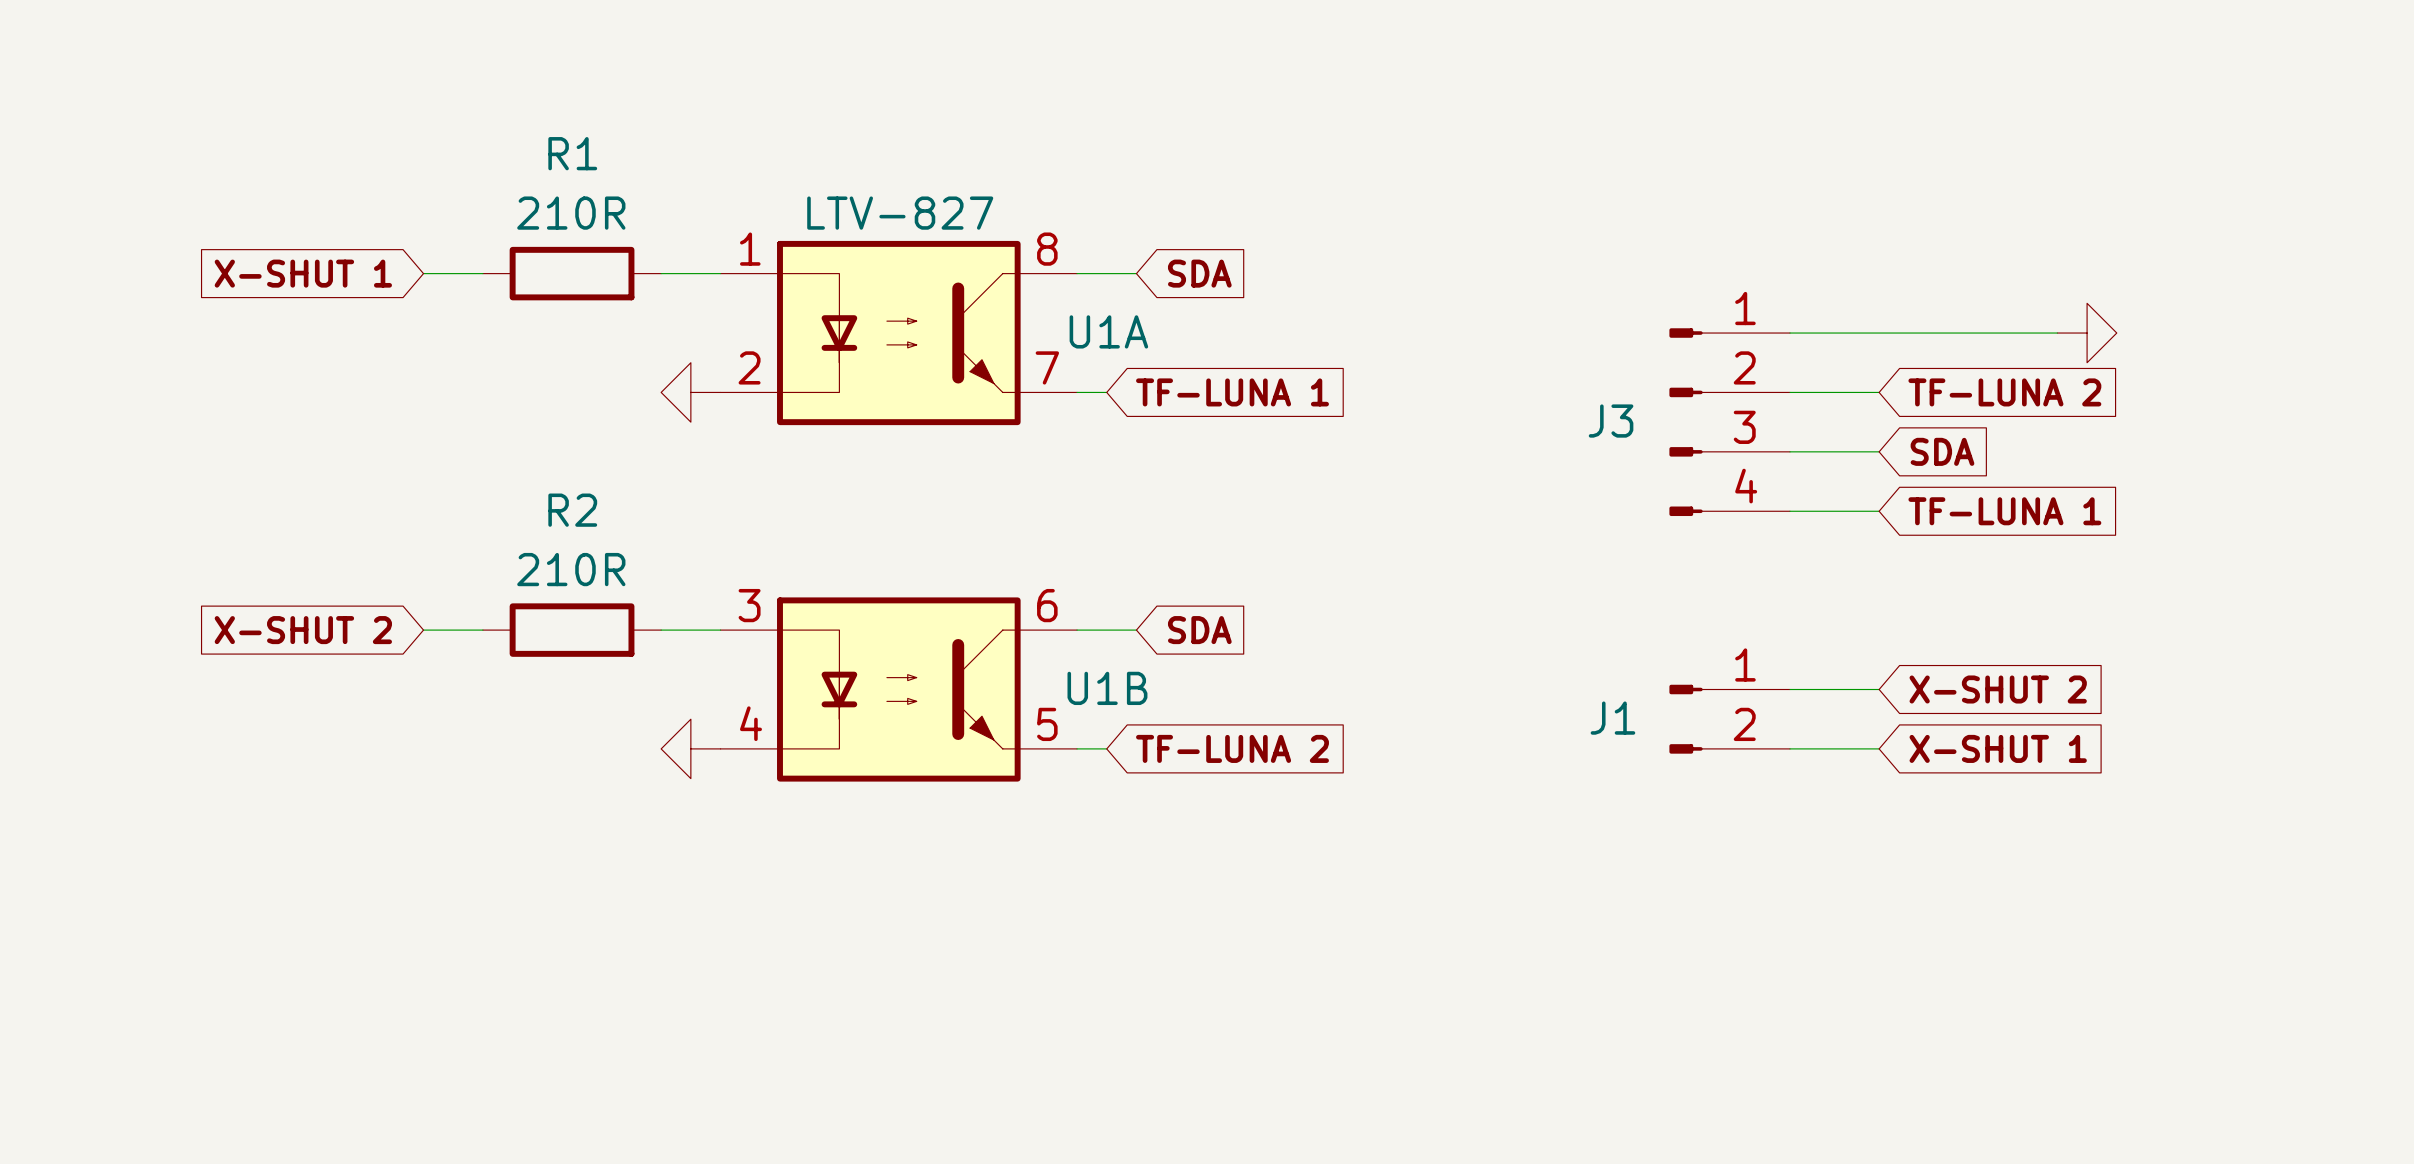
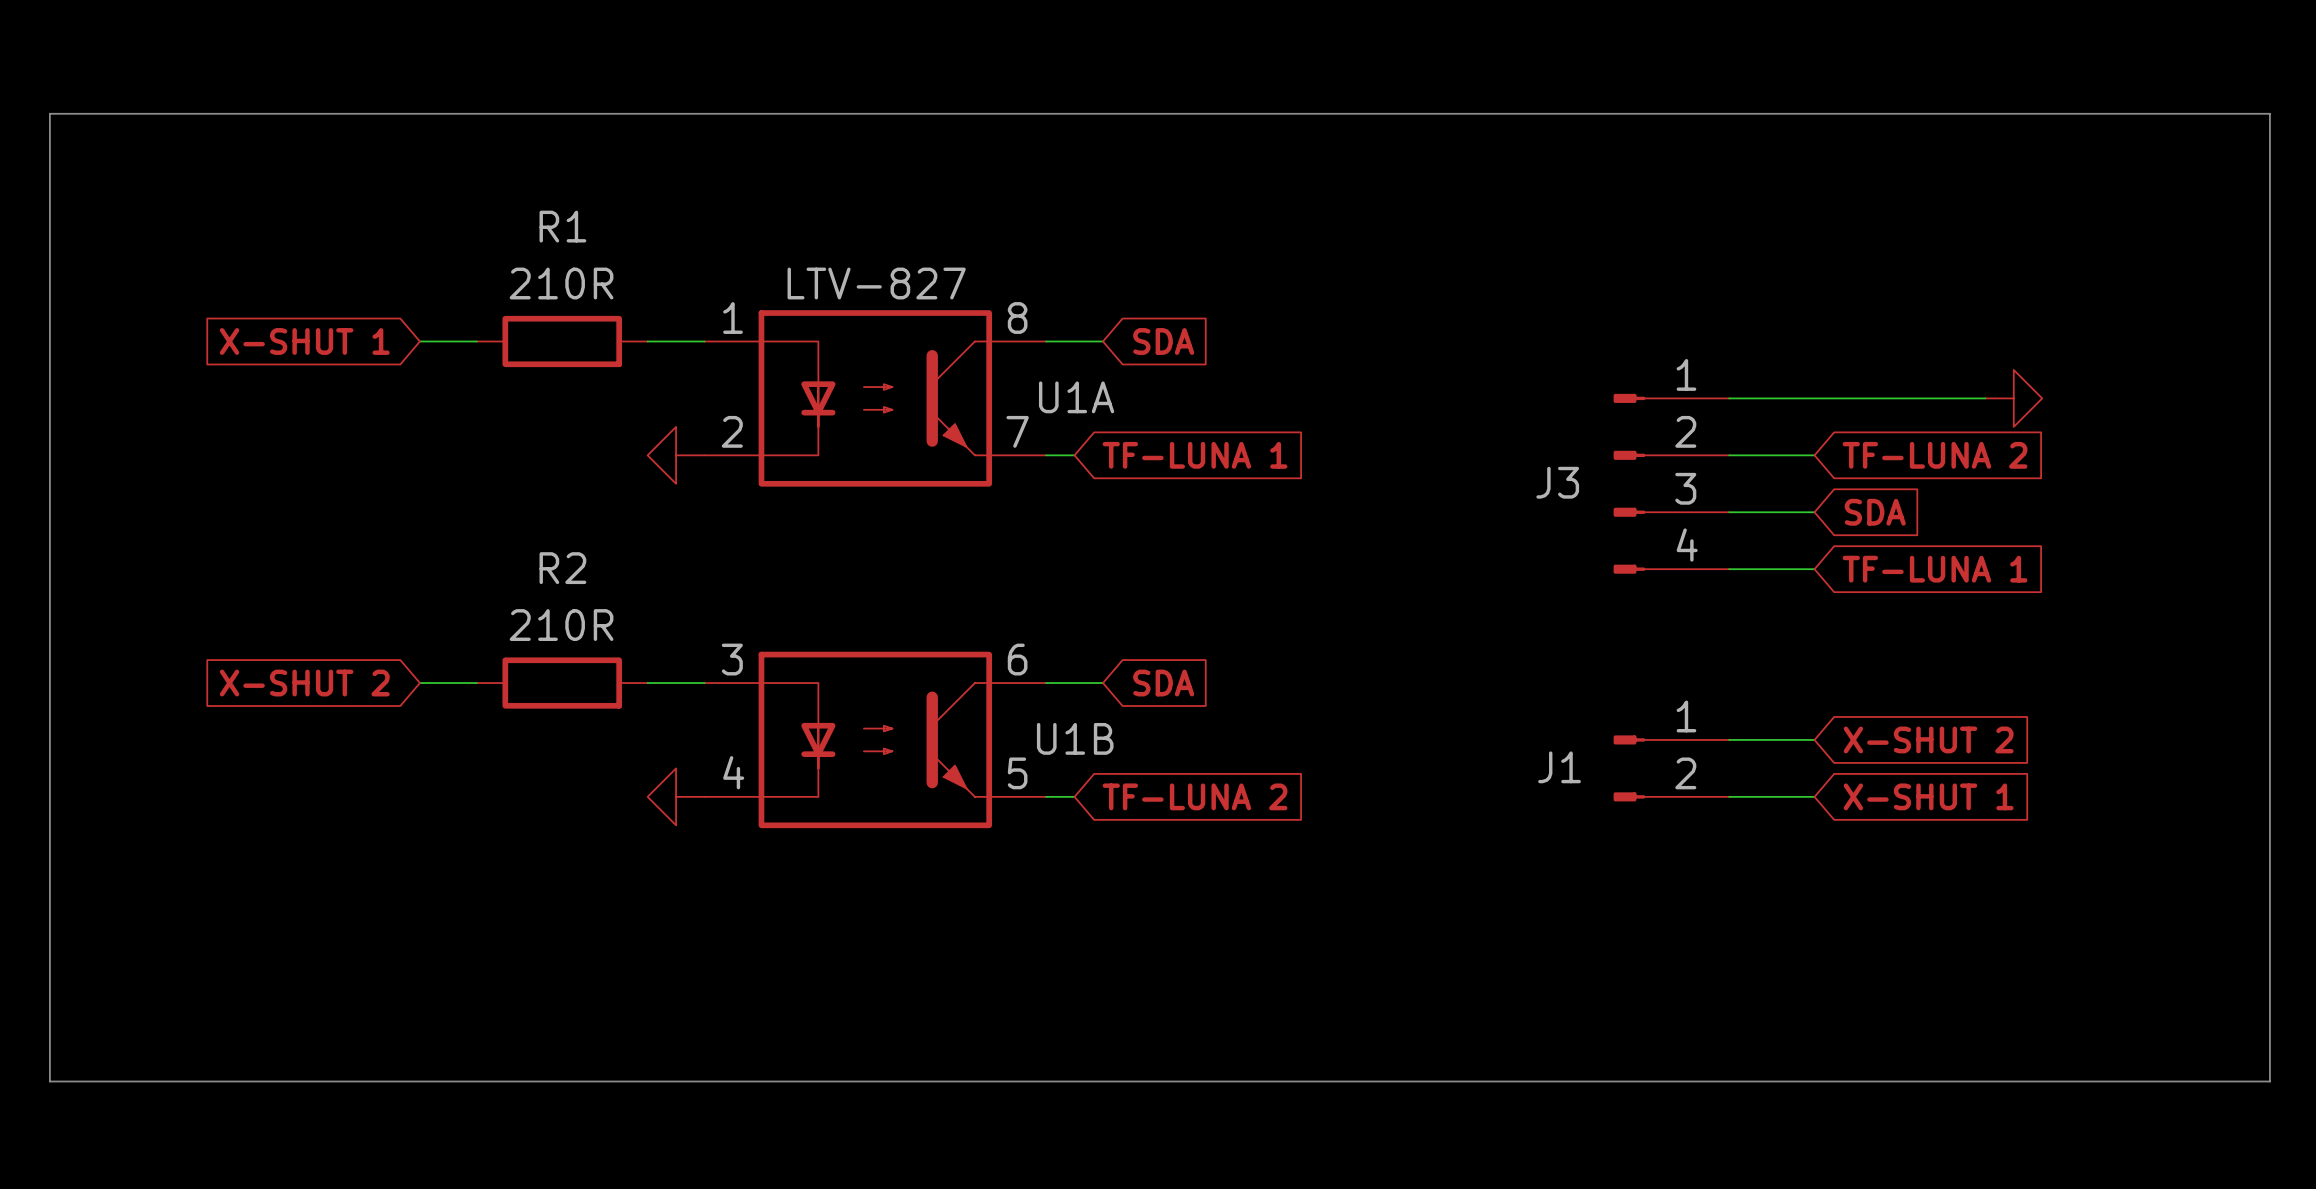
line: none -> (49, 113) (2269, 113) (2269, 1081) (49, 1081) (49, 113)

